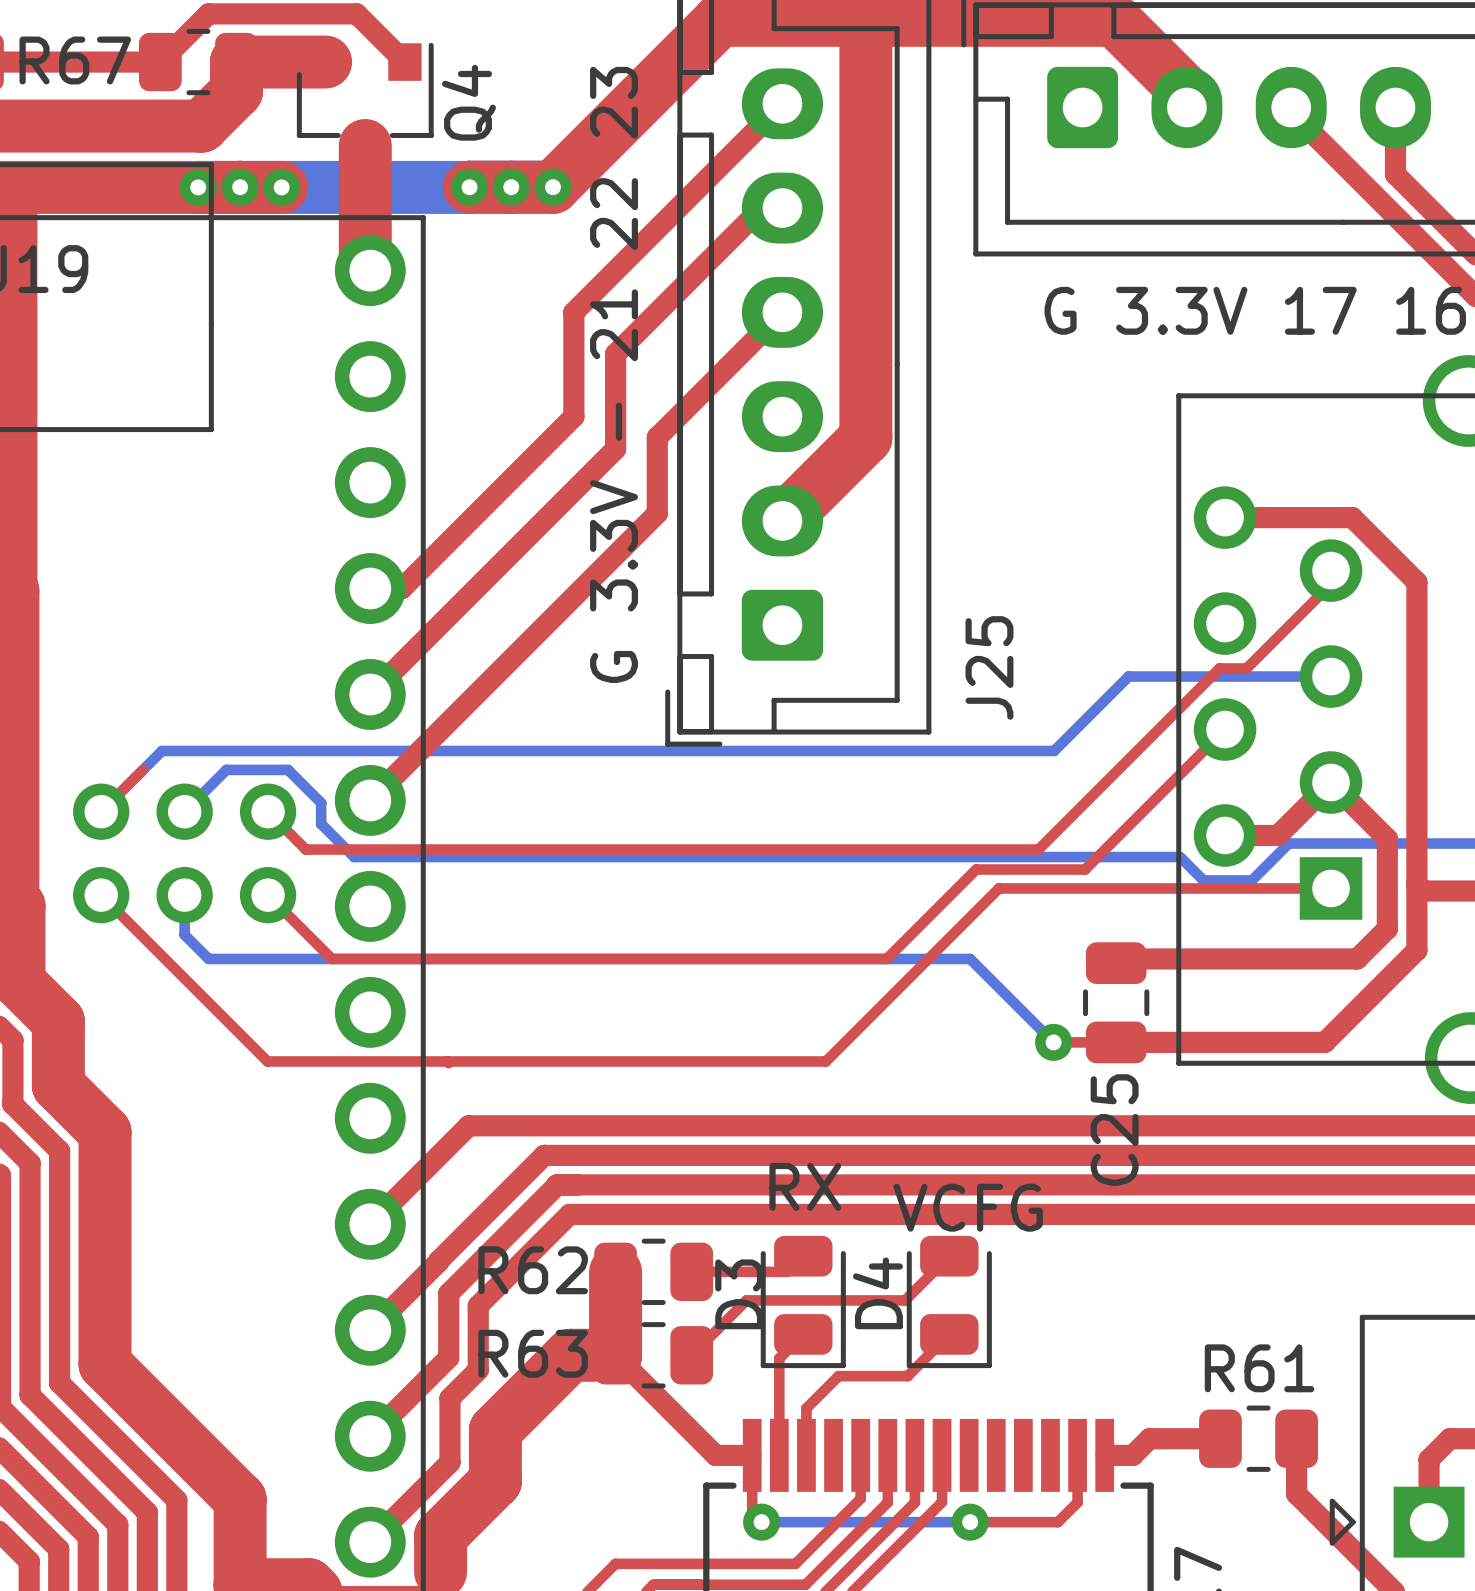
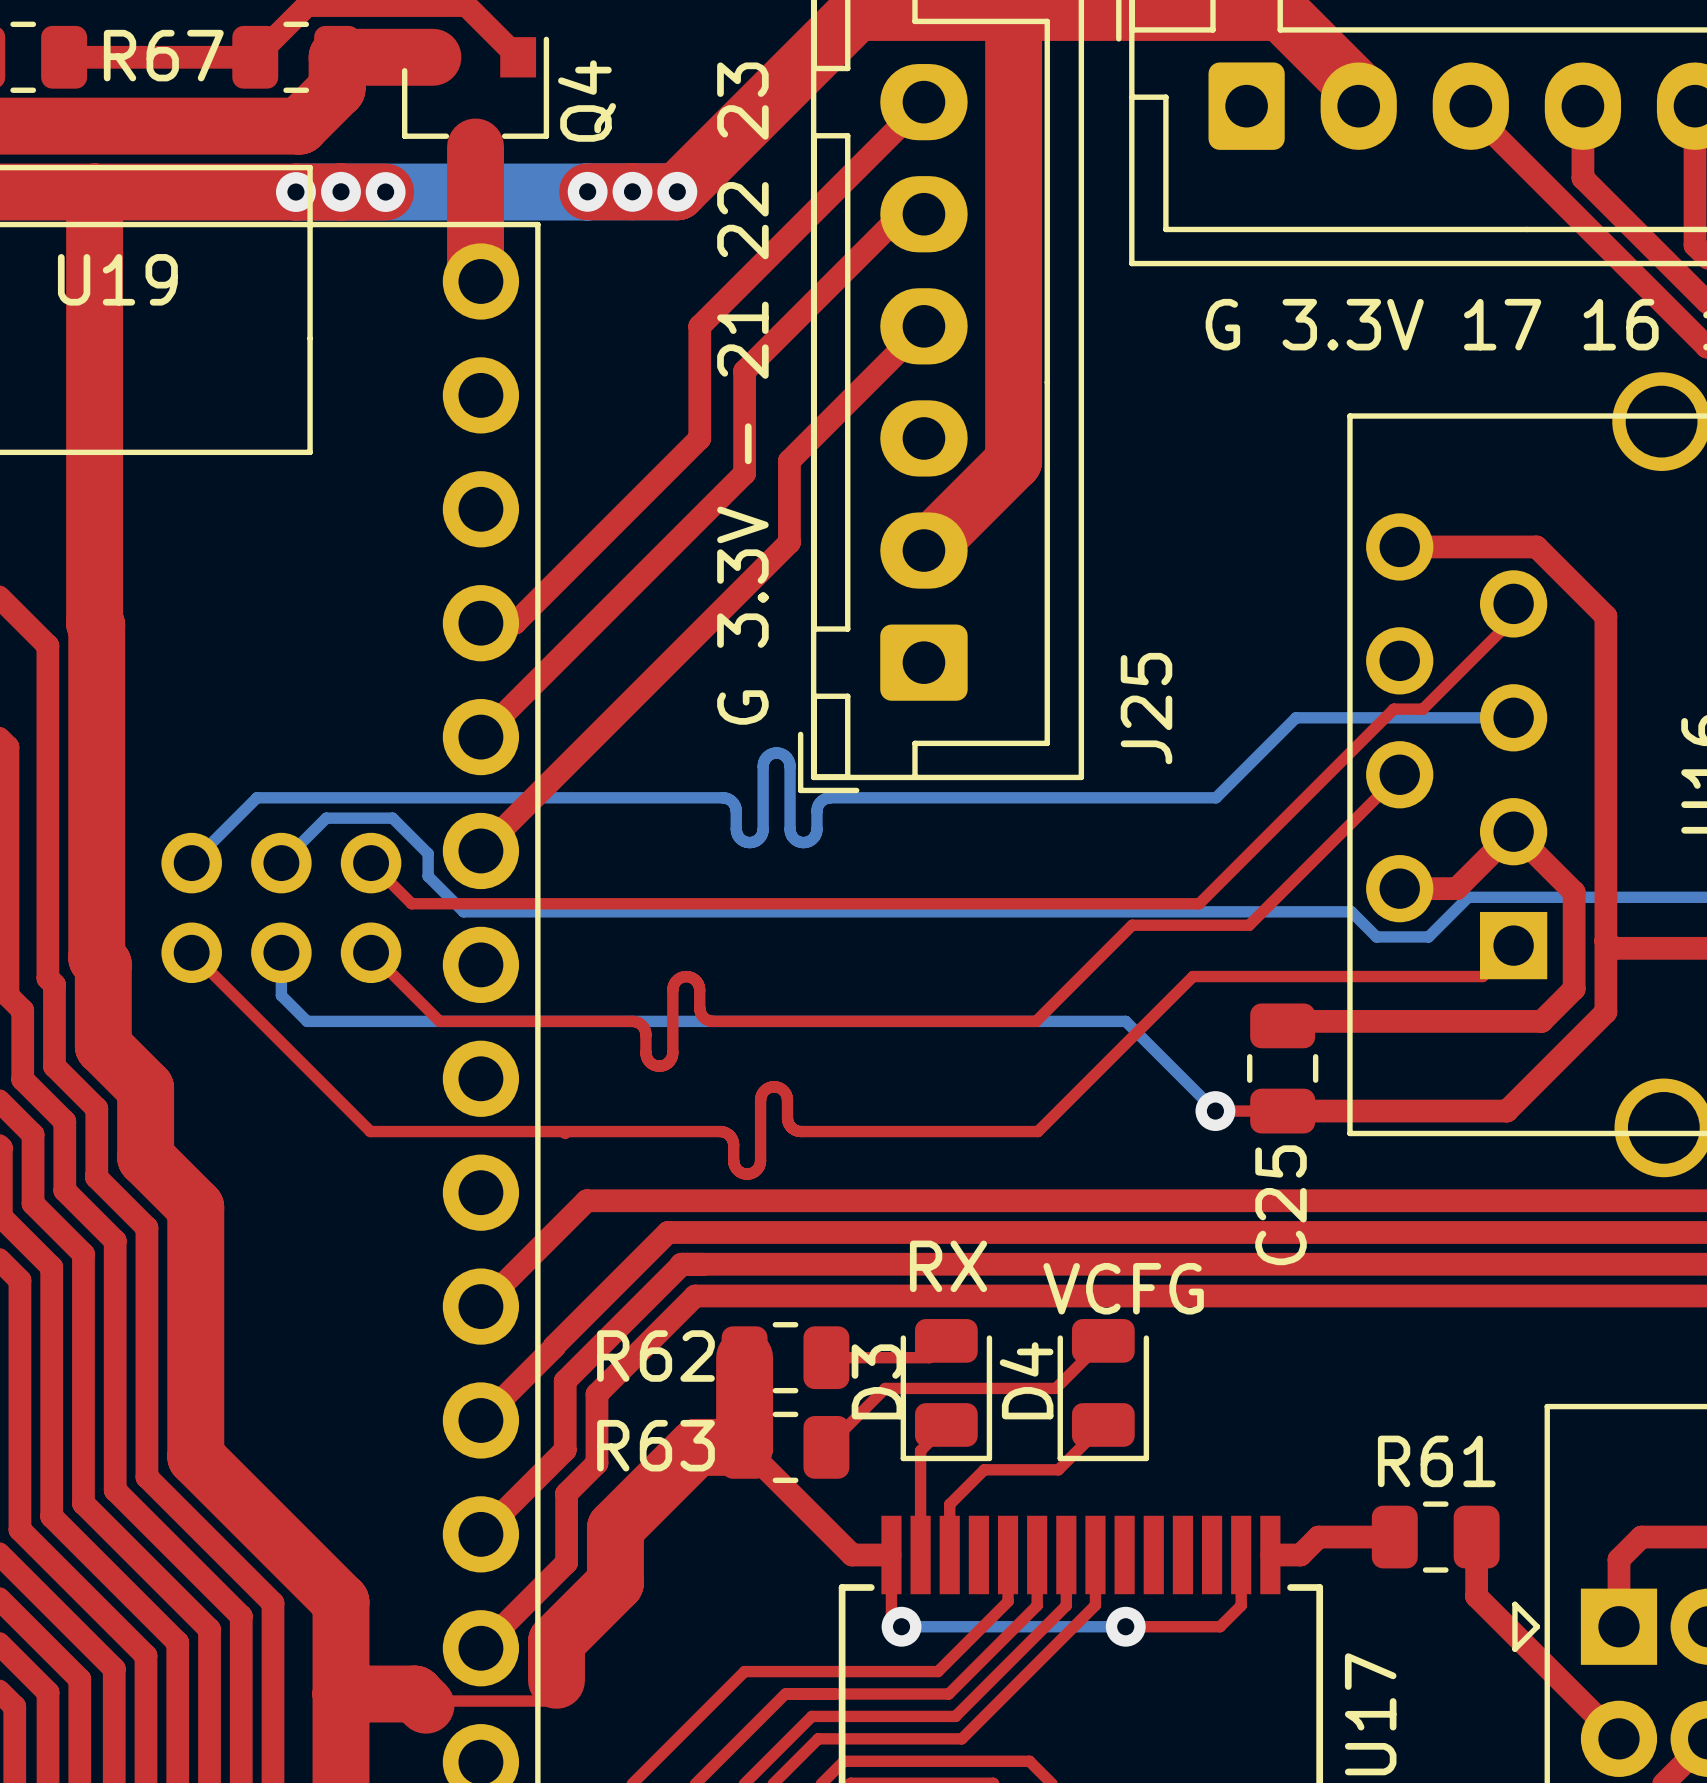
bottom track: (595, 750) (695, 750) -> (722, 797) (728, 799) (734, 805) (737, 835) (743, 841) (749, 842) (758, 839) (762, 832) (763, 766) (764, 760) (770, 754) (782, 754) (789, 763) (790, 829) (795, 839) (803, 842) (814, 837) (816, 832) (818, 805) (824, 799) (830, 797)
top track: (143, 769) (101, 811) -> none
top track: (1331, 888) (998, 888) (825, 1061) -> (1513, 945) (1482, 976) (1193, 976) (1037, 1131) (970, 1131)
top track: (511, 958) (586, 958) -> (632, 1021) (638, 1022) (644, 1029) (647, 1058) (653, 1064) (659, 1066) (667, 1063) (672, 1055) (672, 989) (677, 979) (686, 976) (696, 981) (699, 987) (701, 1013) (707, 1020) (713, 1021)
top track: (592, 1061) (668, 1061) -> (720, 1131) (726, 1132) (732, 1139) (734, 1163) (736, 1169) (747, 1174) (755, 1171) (760, 1160) (760, 1097) (765, 1089) (774, 1086) (779, 1088) (786, 1094) (788, 1123) (795, 1130) (800, 1131)

